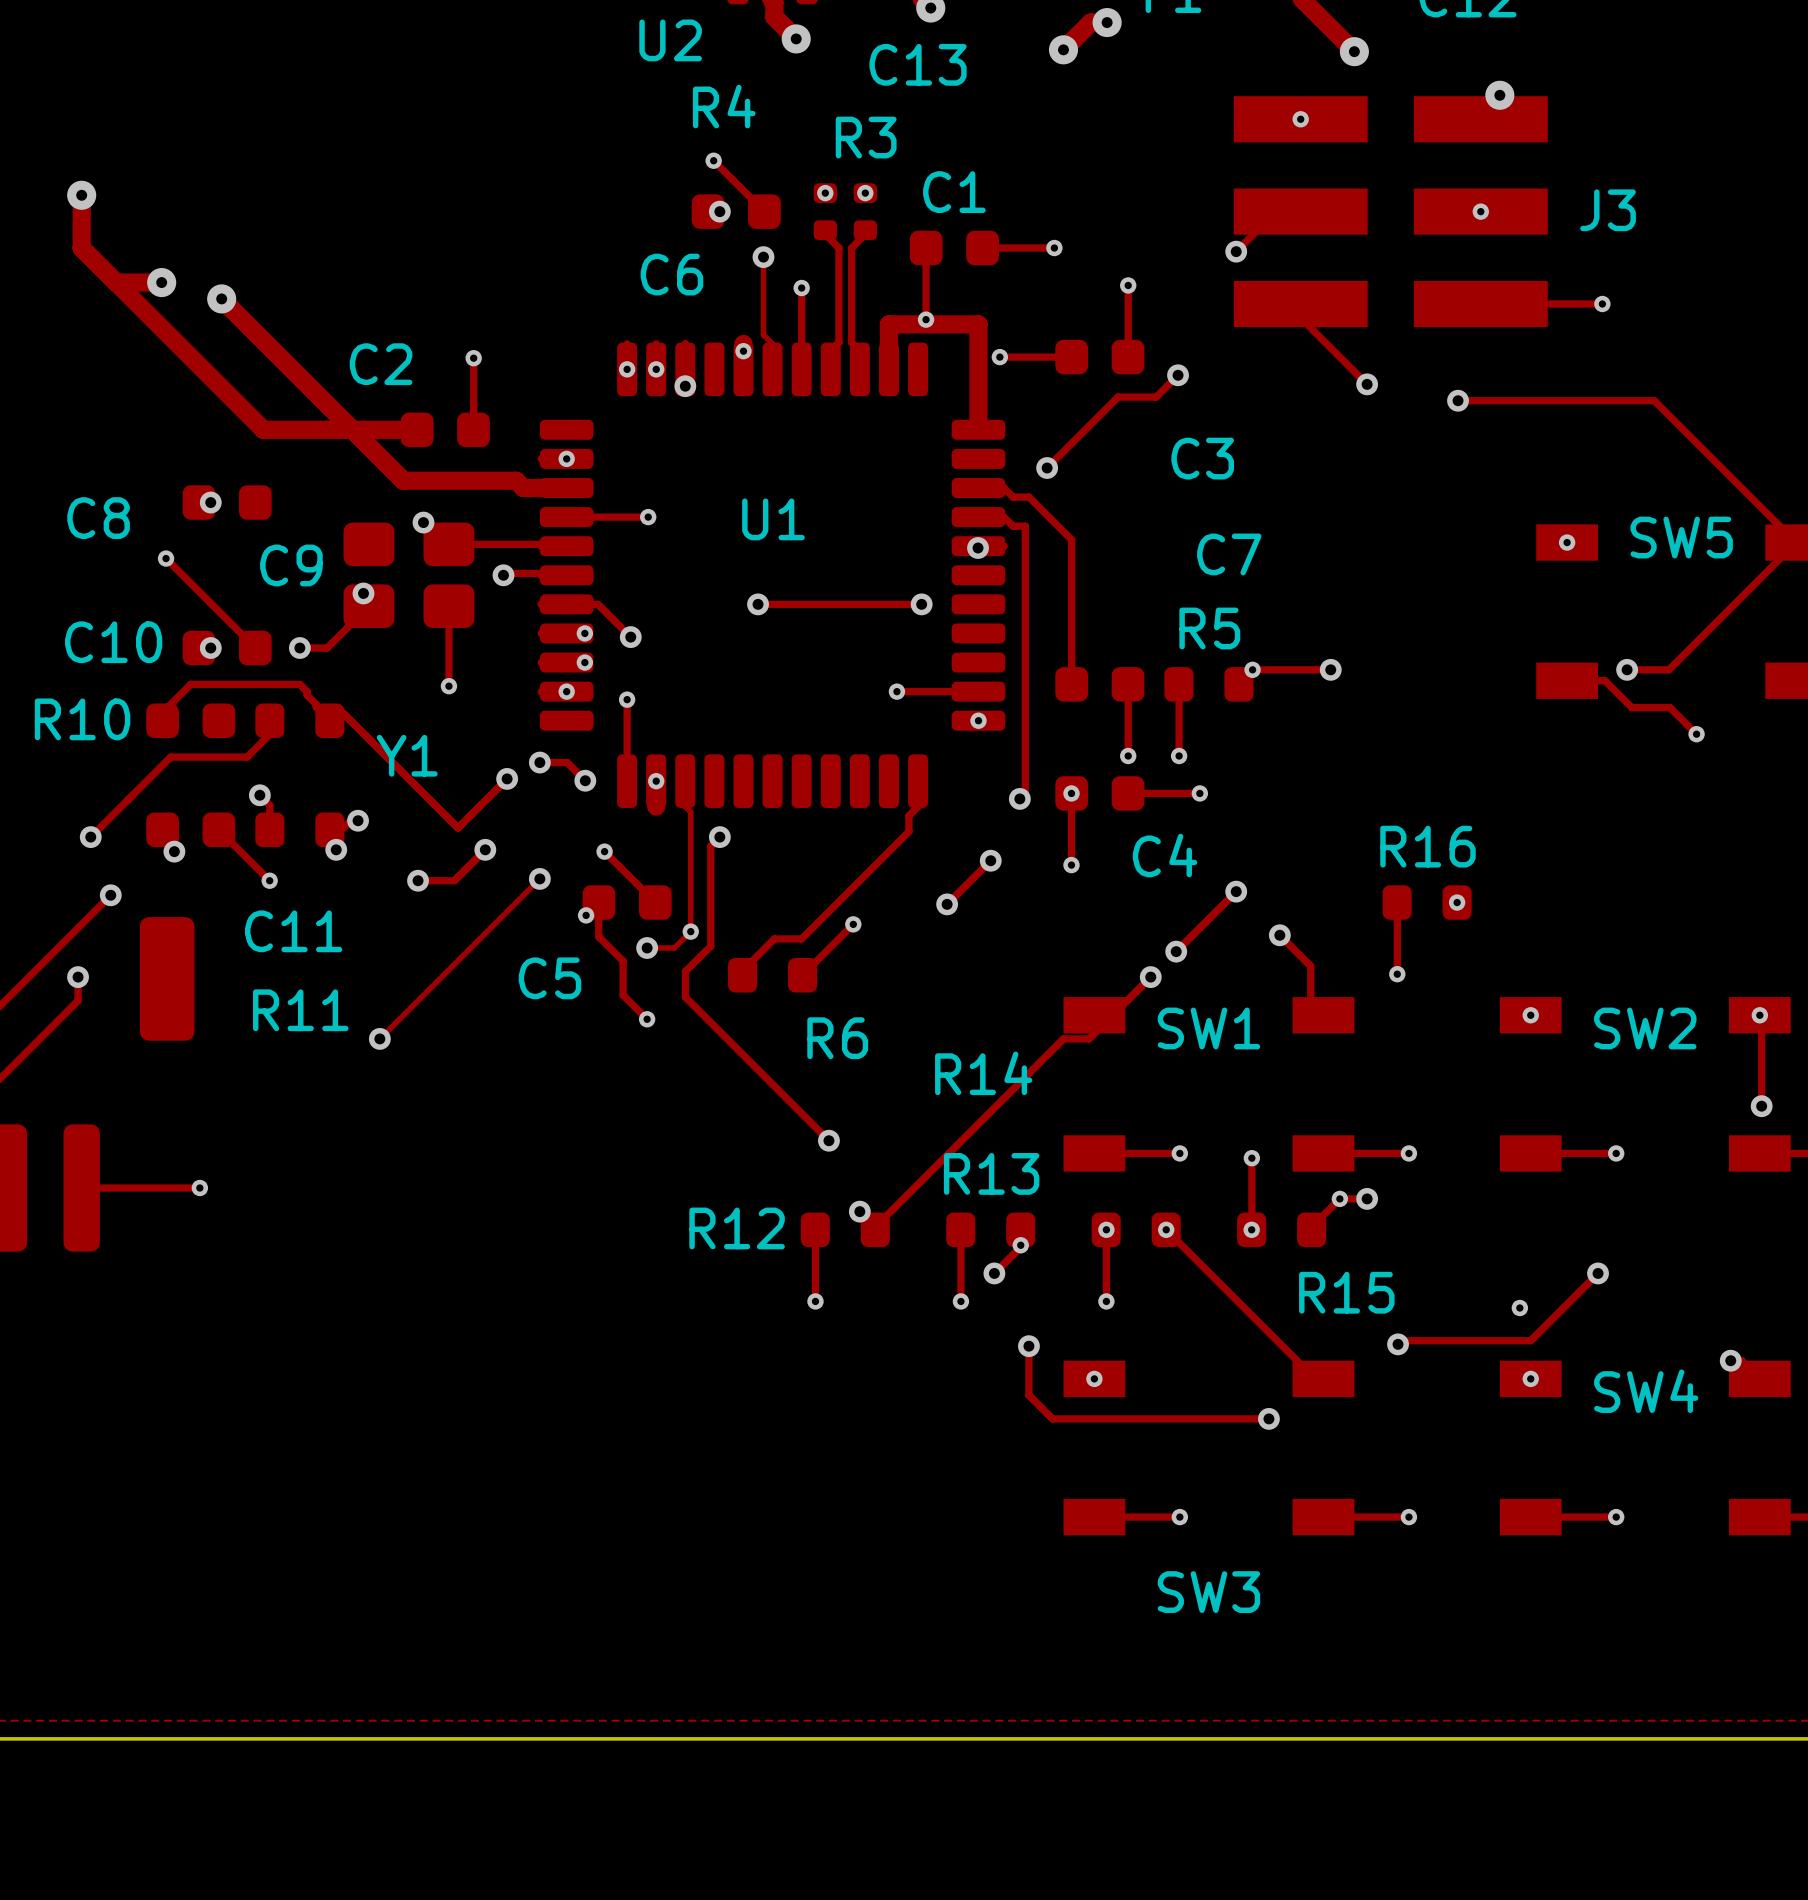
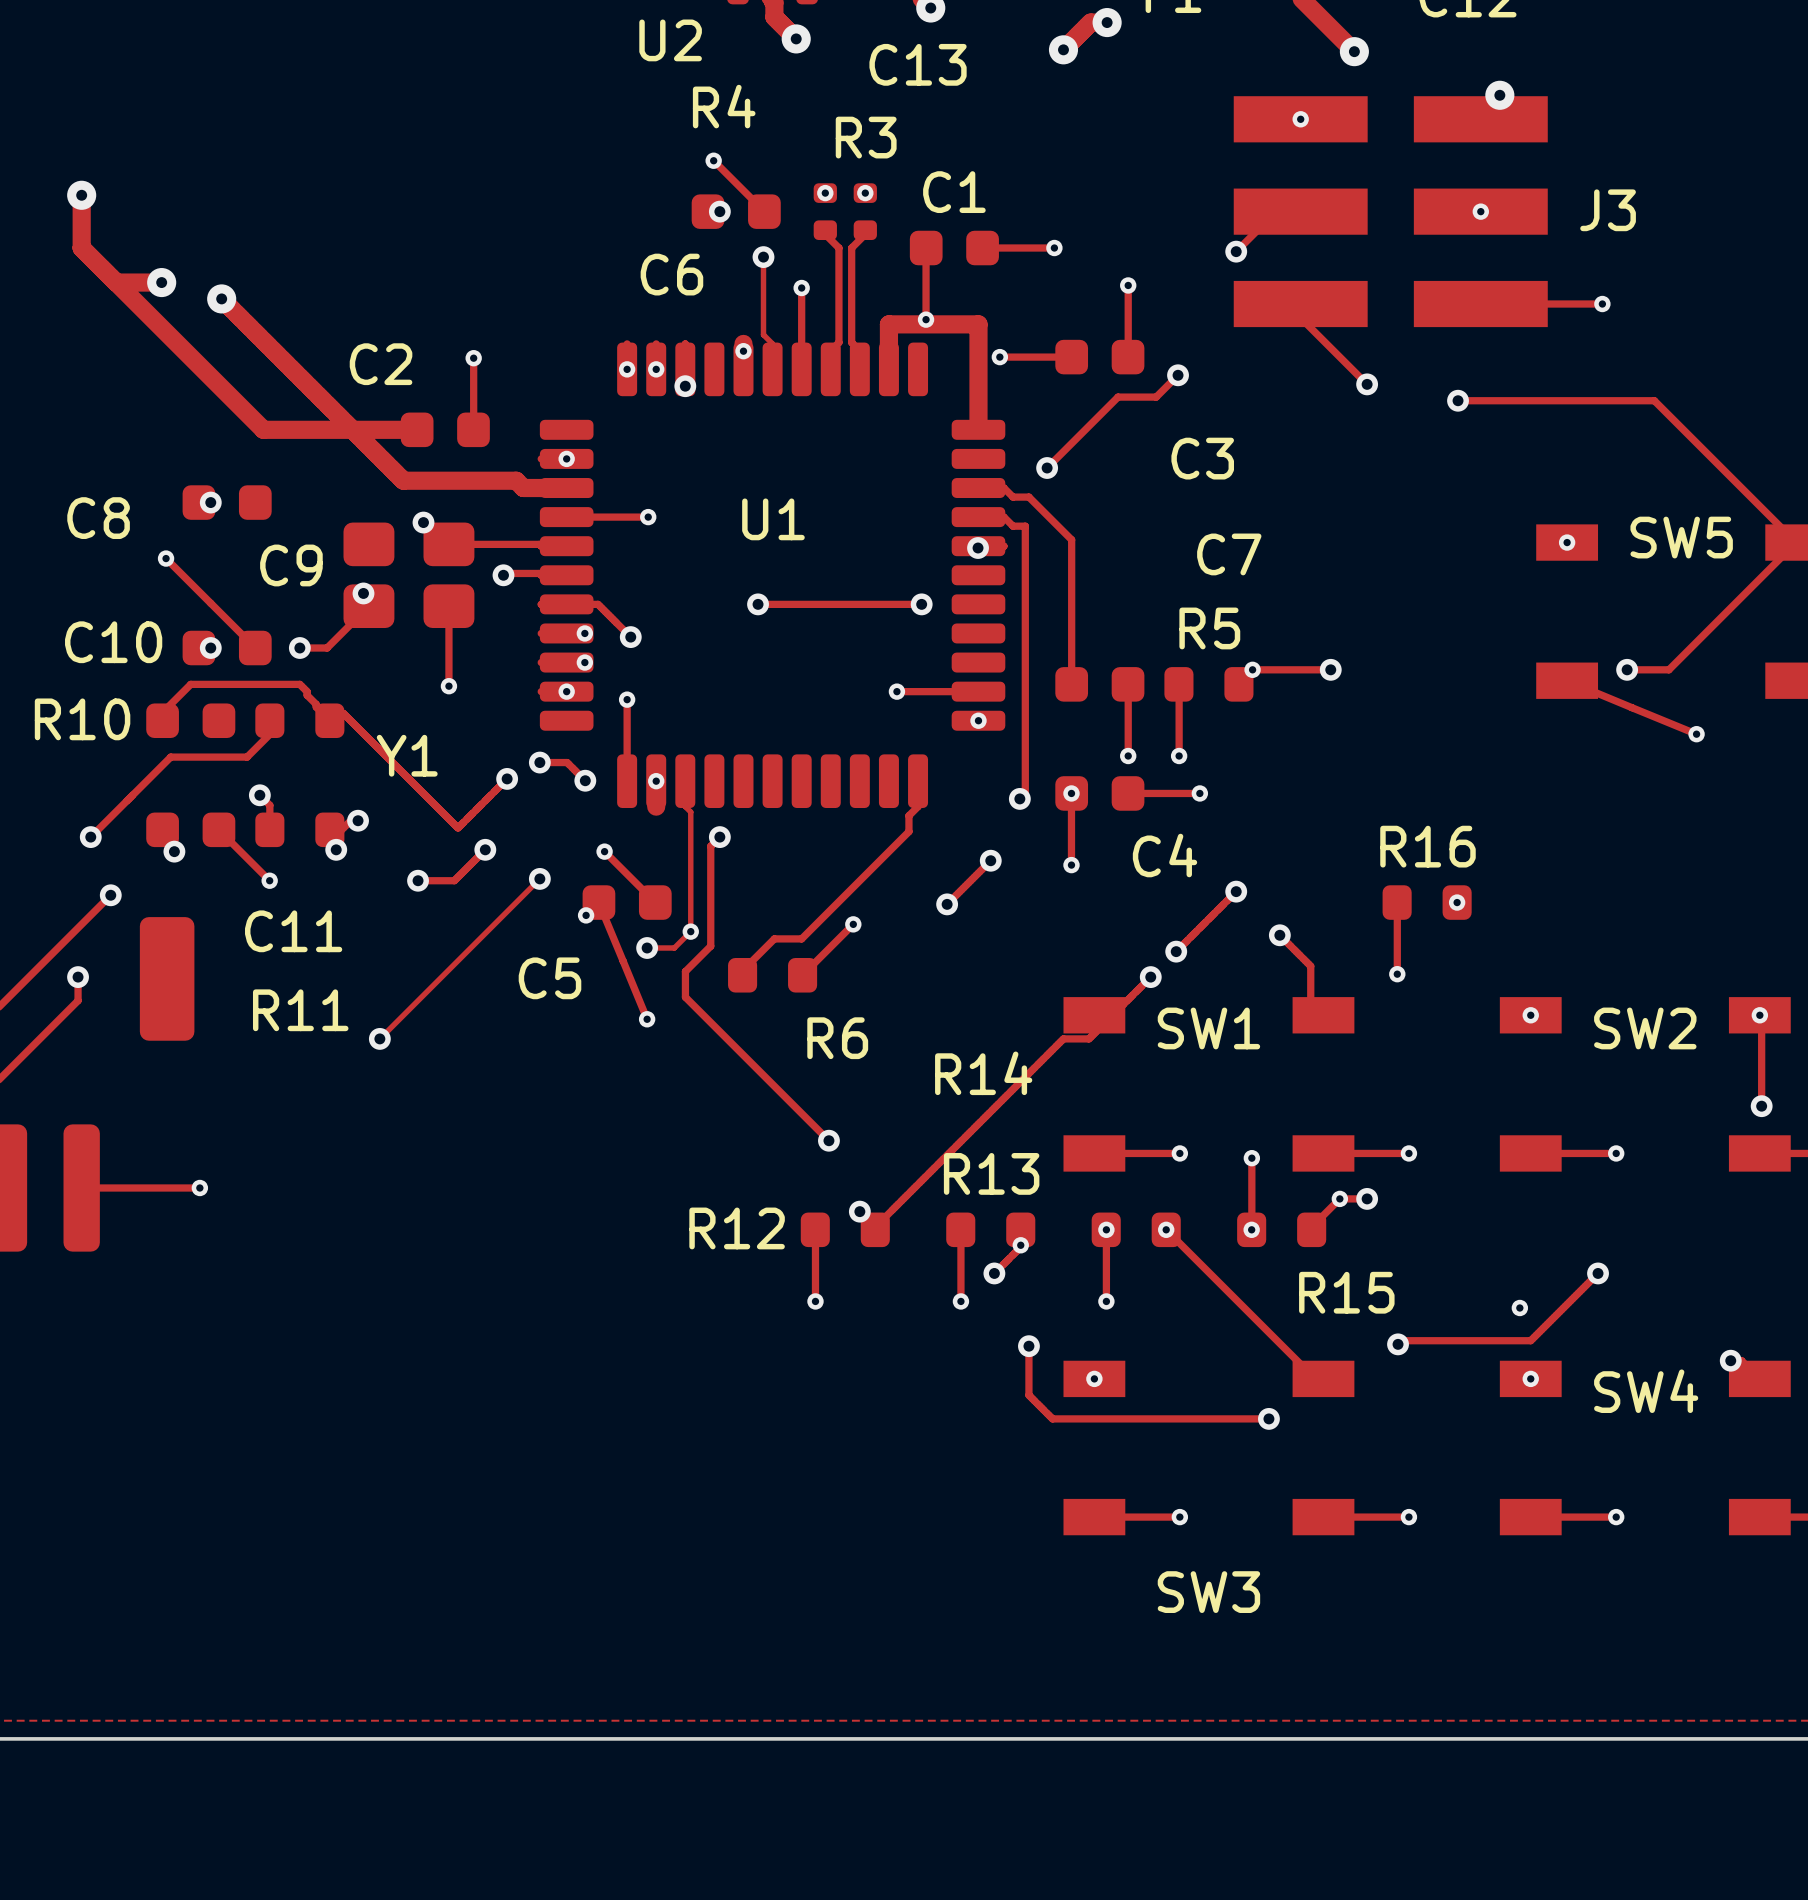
track: (1567, 680) (1604, 680) (1631, 707) (1670, 707) (1696, 734) -> (1567, 680) (1696, 734)
track: (598, 902) (598, 936) (623, 961) (623, 995) (647, 1019) -> (598, 902) (647, 1019)

